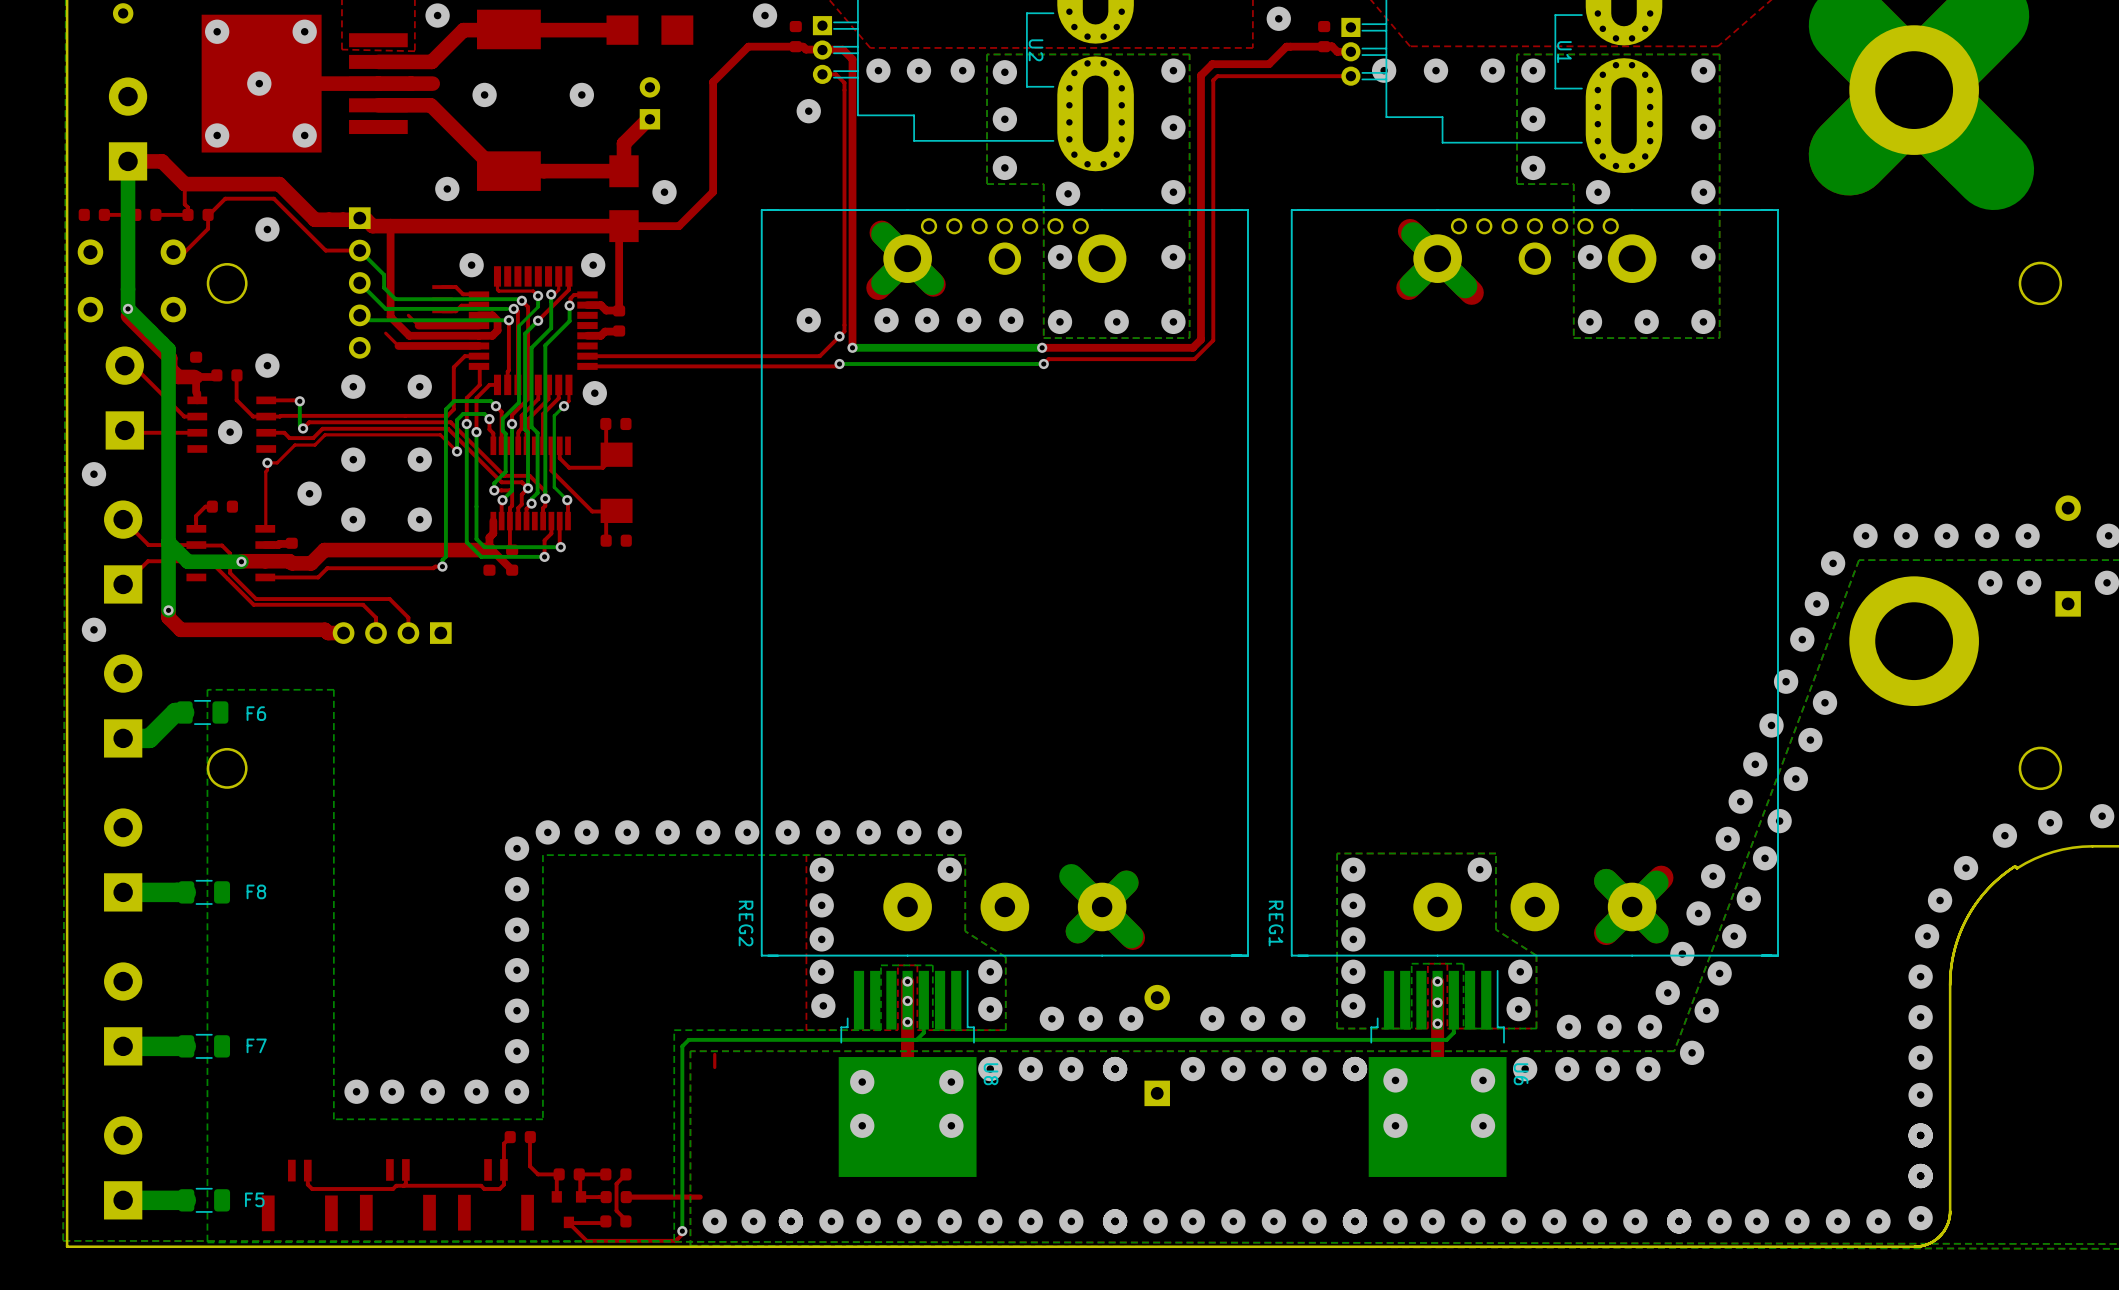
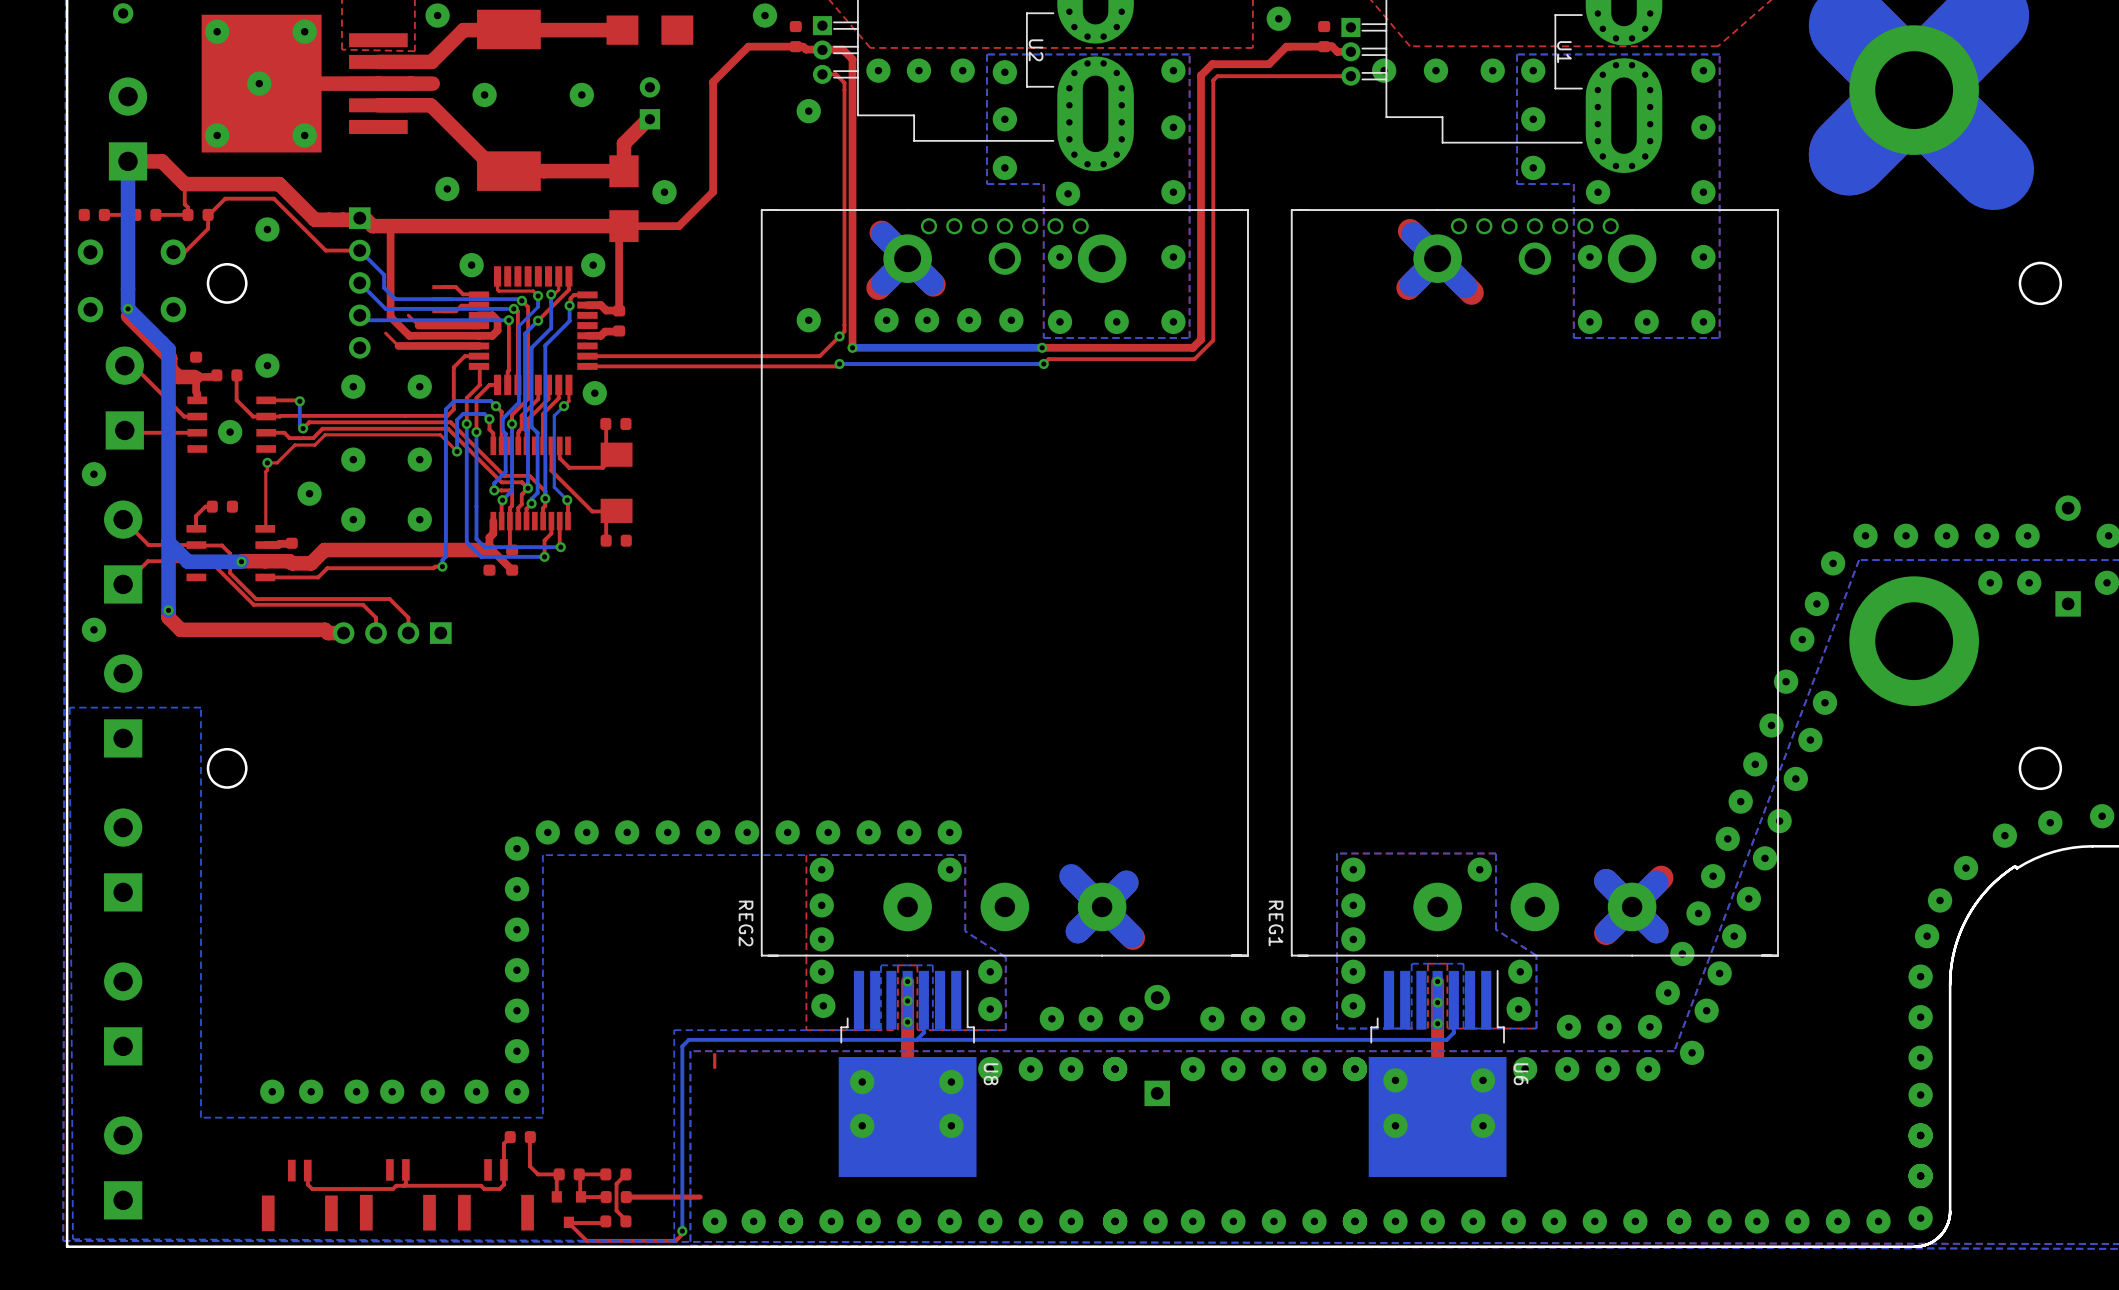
bottom track: (184, 712) (175, 712) (149, 738) (124, 738) -> none
F6: (202, 712) -> none
bottom track: (186, 892) (124, 892) -> none
F8: (204, 892) -> none
bottom track: (186, 1046) (124, 1046) (123, 1047) -> none
F7: (204, 1046) -> none
via: none -> (272, 1091)
via: none -> (311, 1091)
bottom zone outline: (542, 1117) (542, 1119) (333, 1119) (333, 689) (207, 689) (207, 1242) (674, 1240) -> (542, 1117) (200, 1117) (200, 707) (69, 707) (72, 1239) (674, 1240)
bottom track: (186, 1200) (124, 1200) -> none
F5: (204, 1200) -> none

